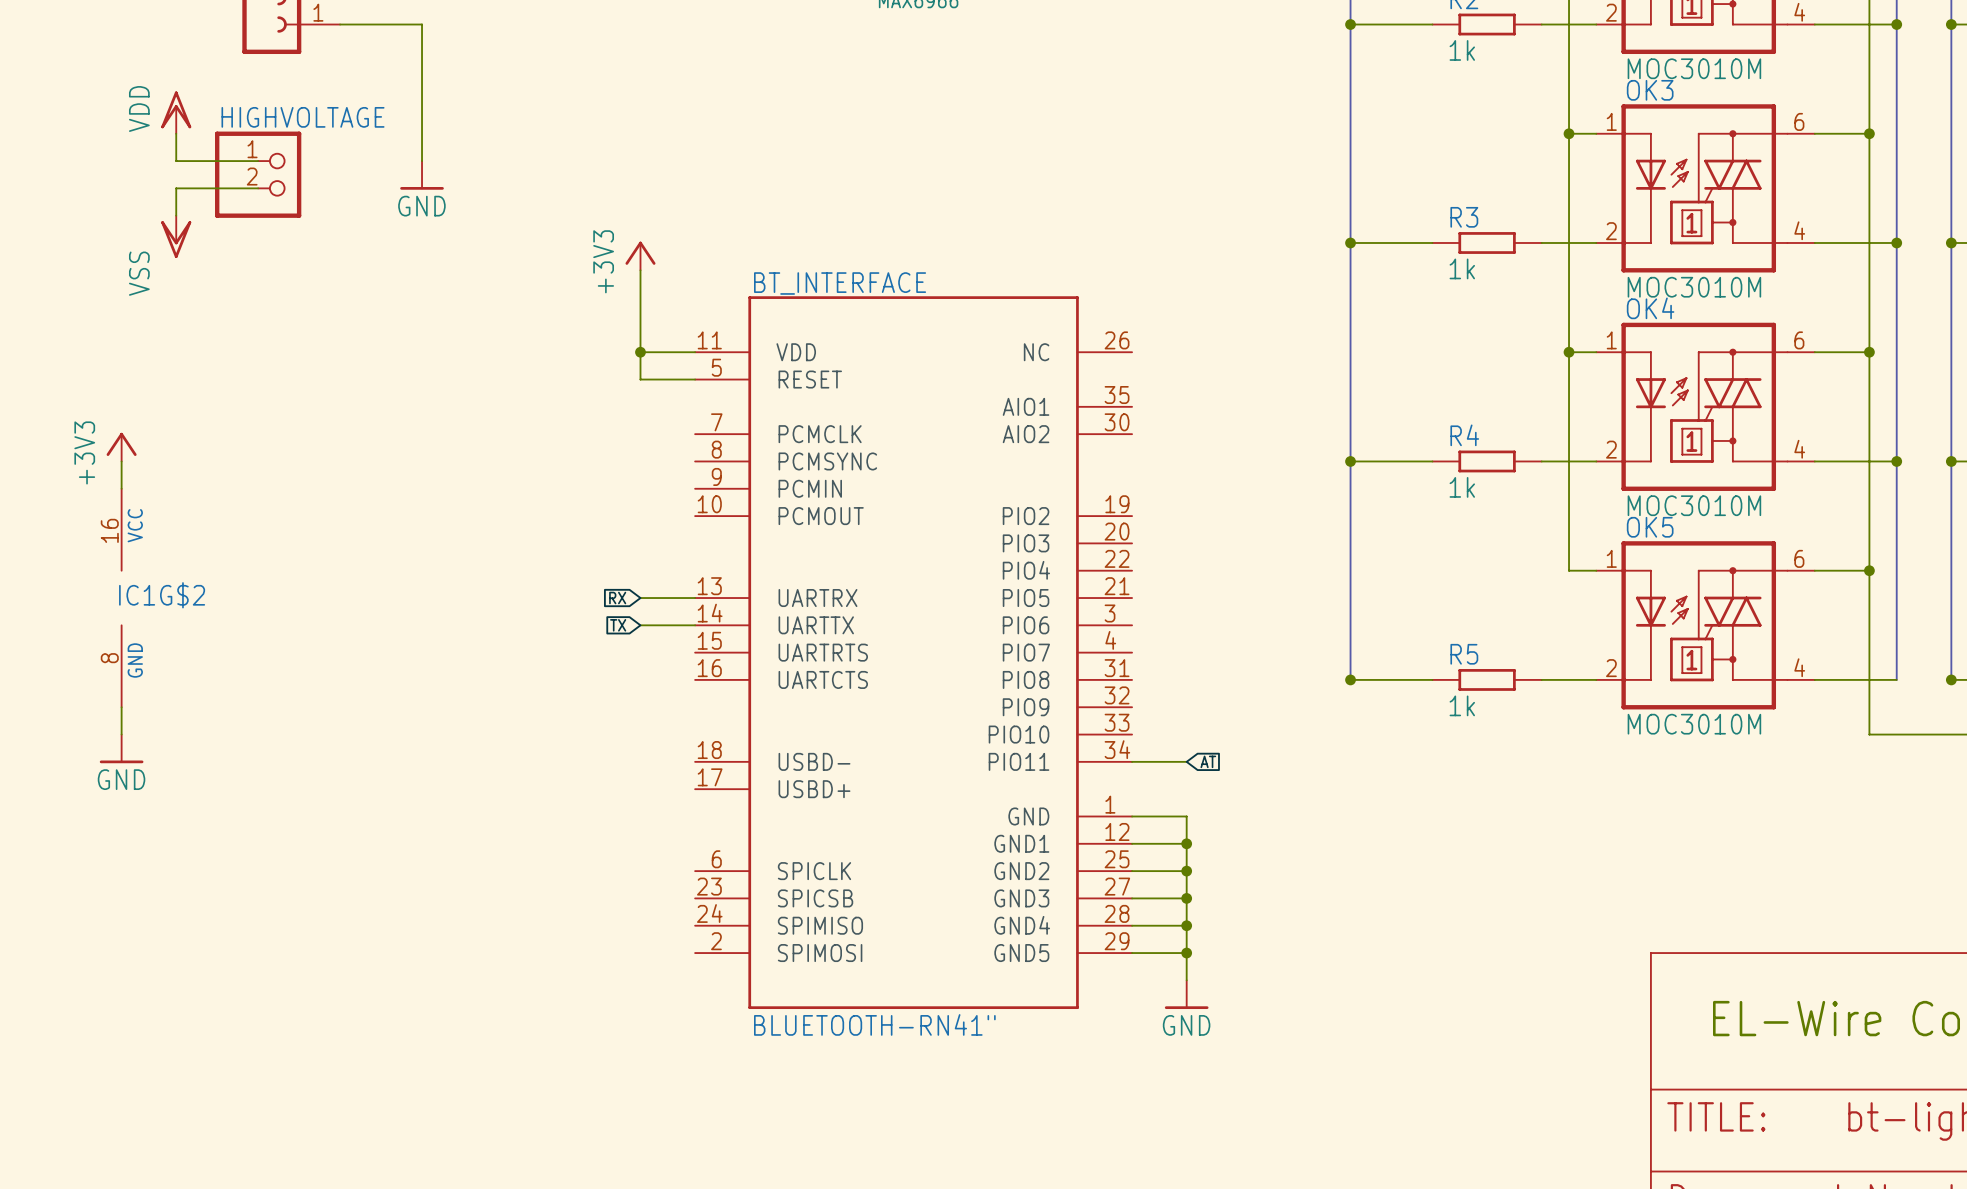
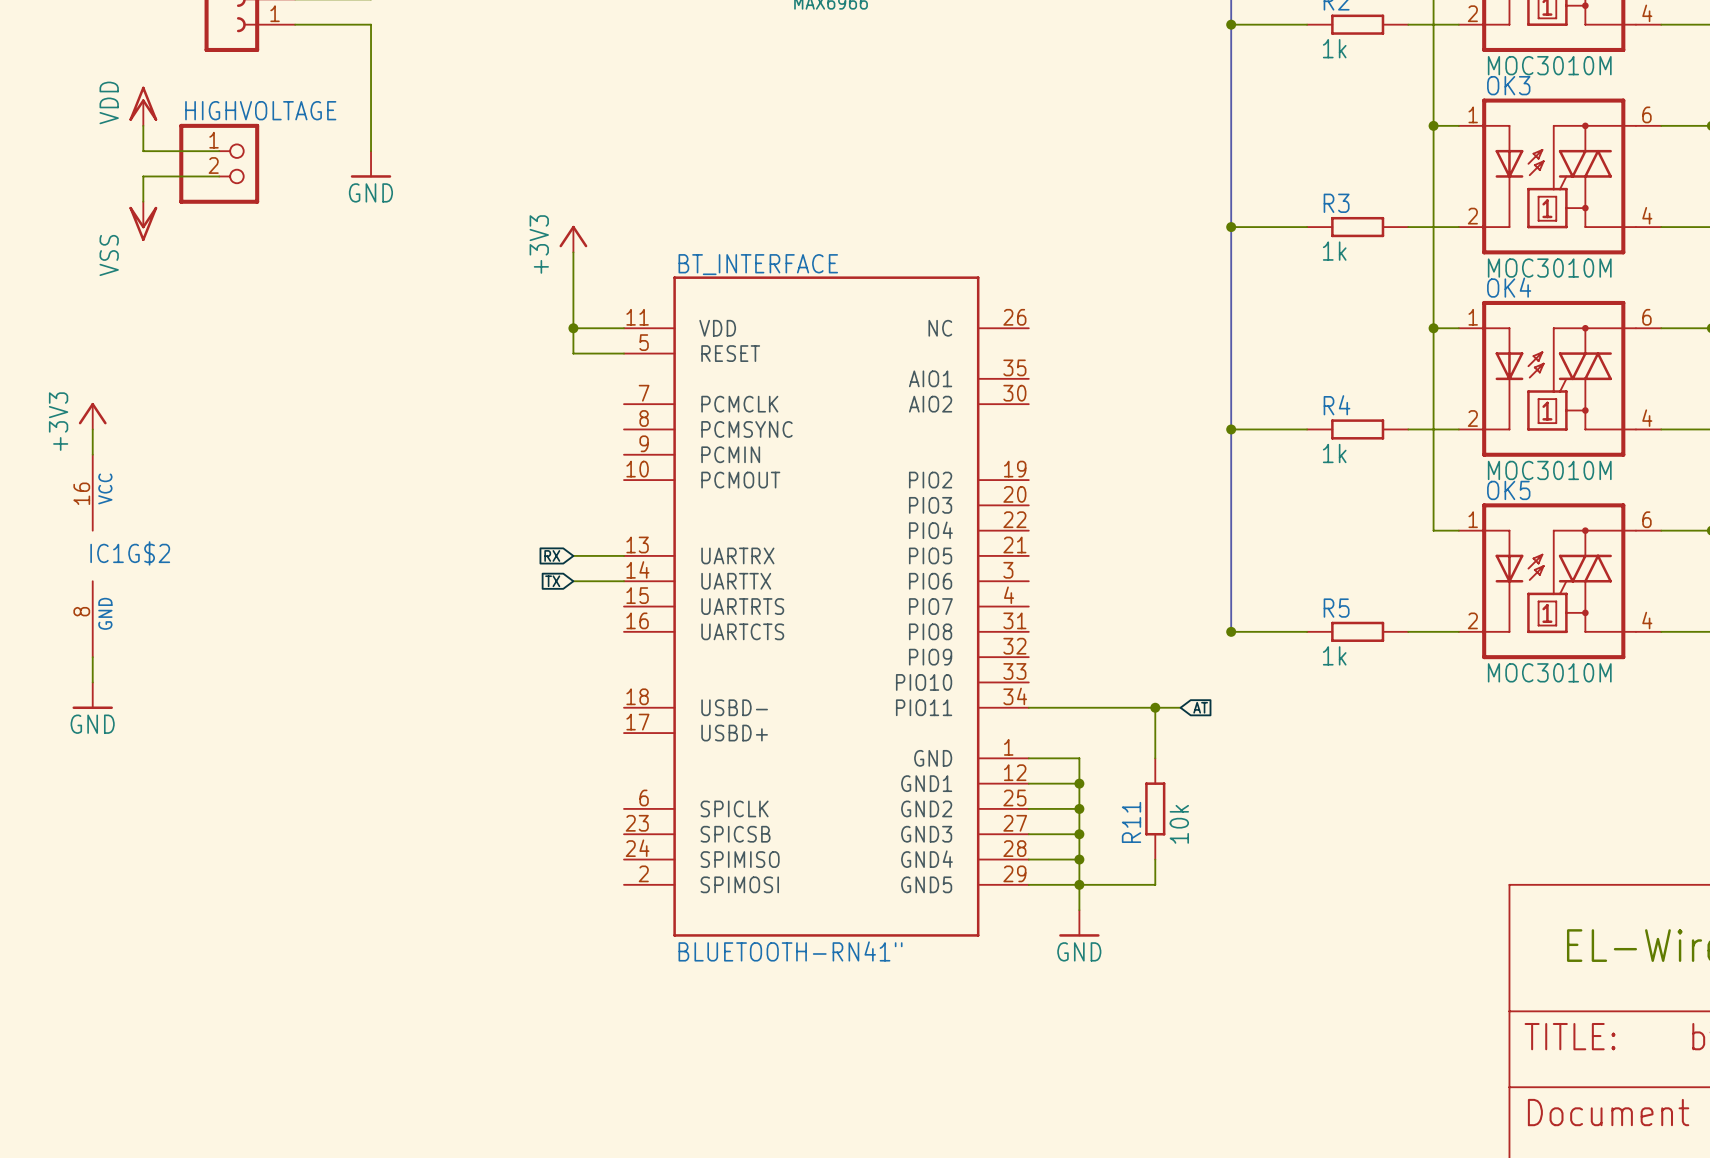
wire: none -> (1079, 707) (1180, 707)
global label position: AT (1208, 761) -> AT (1200, 707)
wire: none -> (1155, 707) (1155, 758)
junction: none -> (1155, 707)
R11: none -> 10k (1155, 808)
wire: none -> (1155, 859) (1155, 884) (1079, 884)

